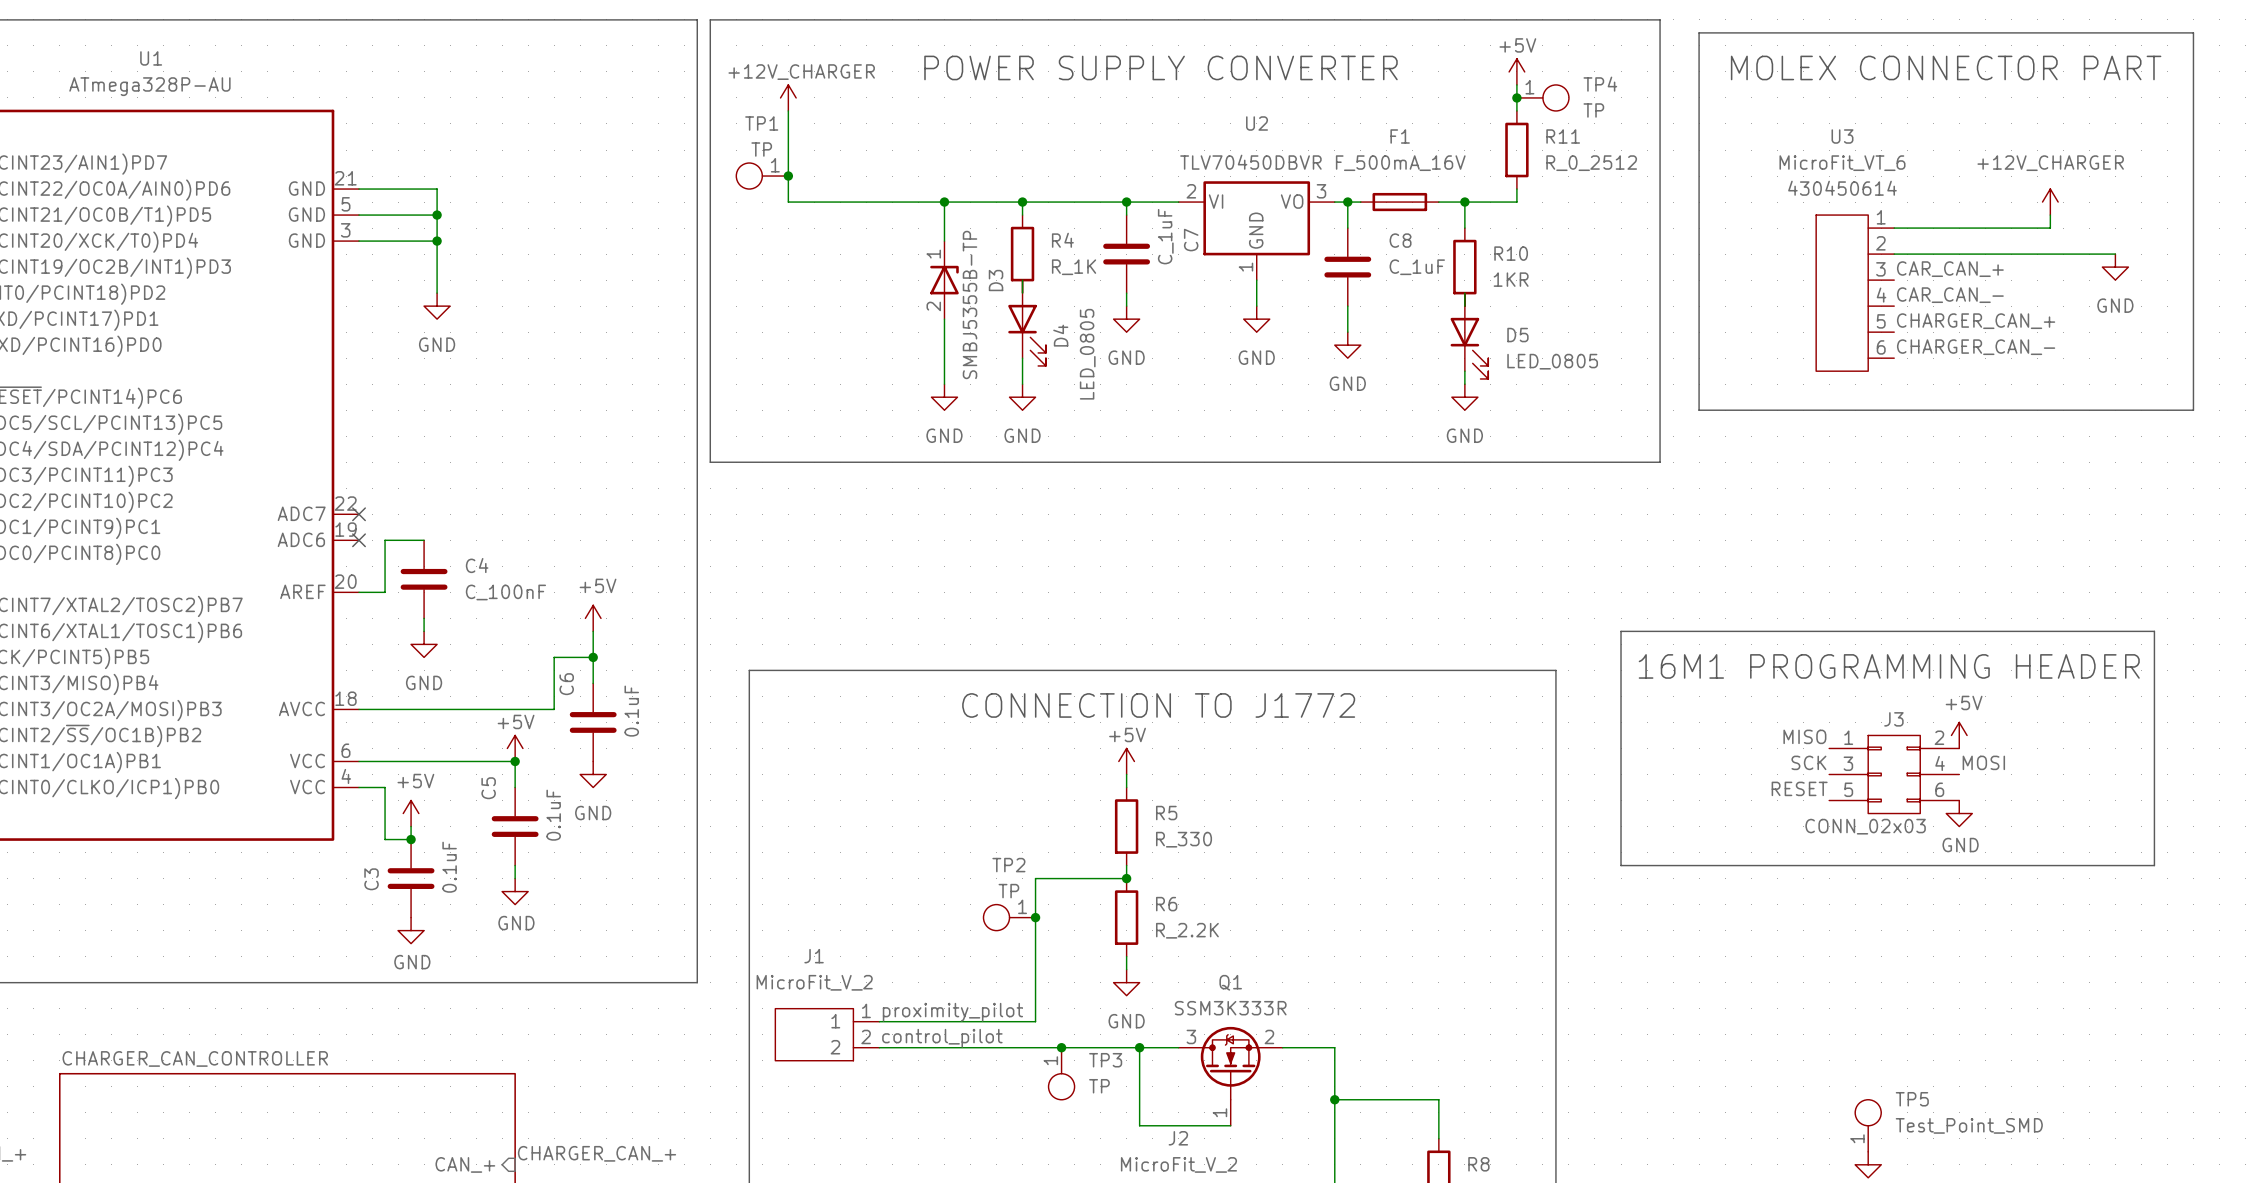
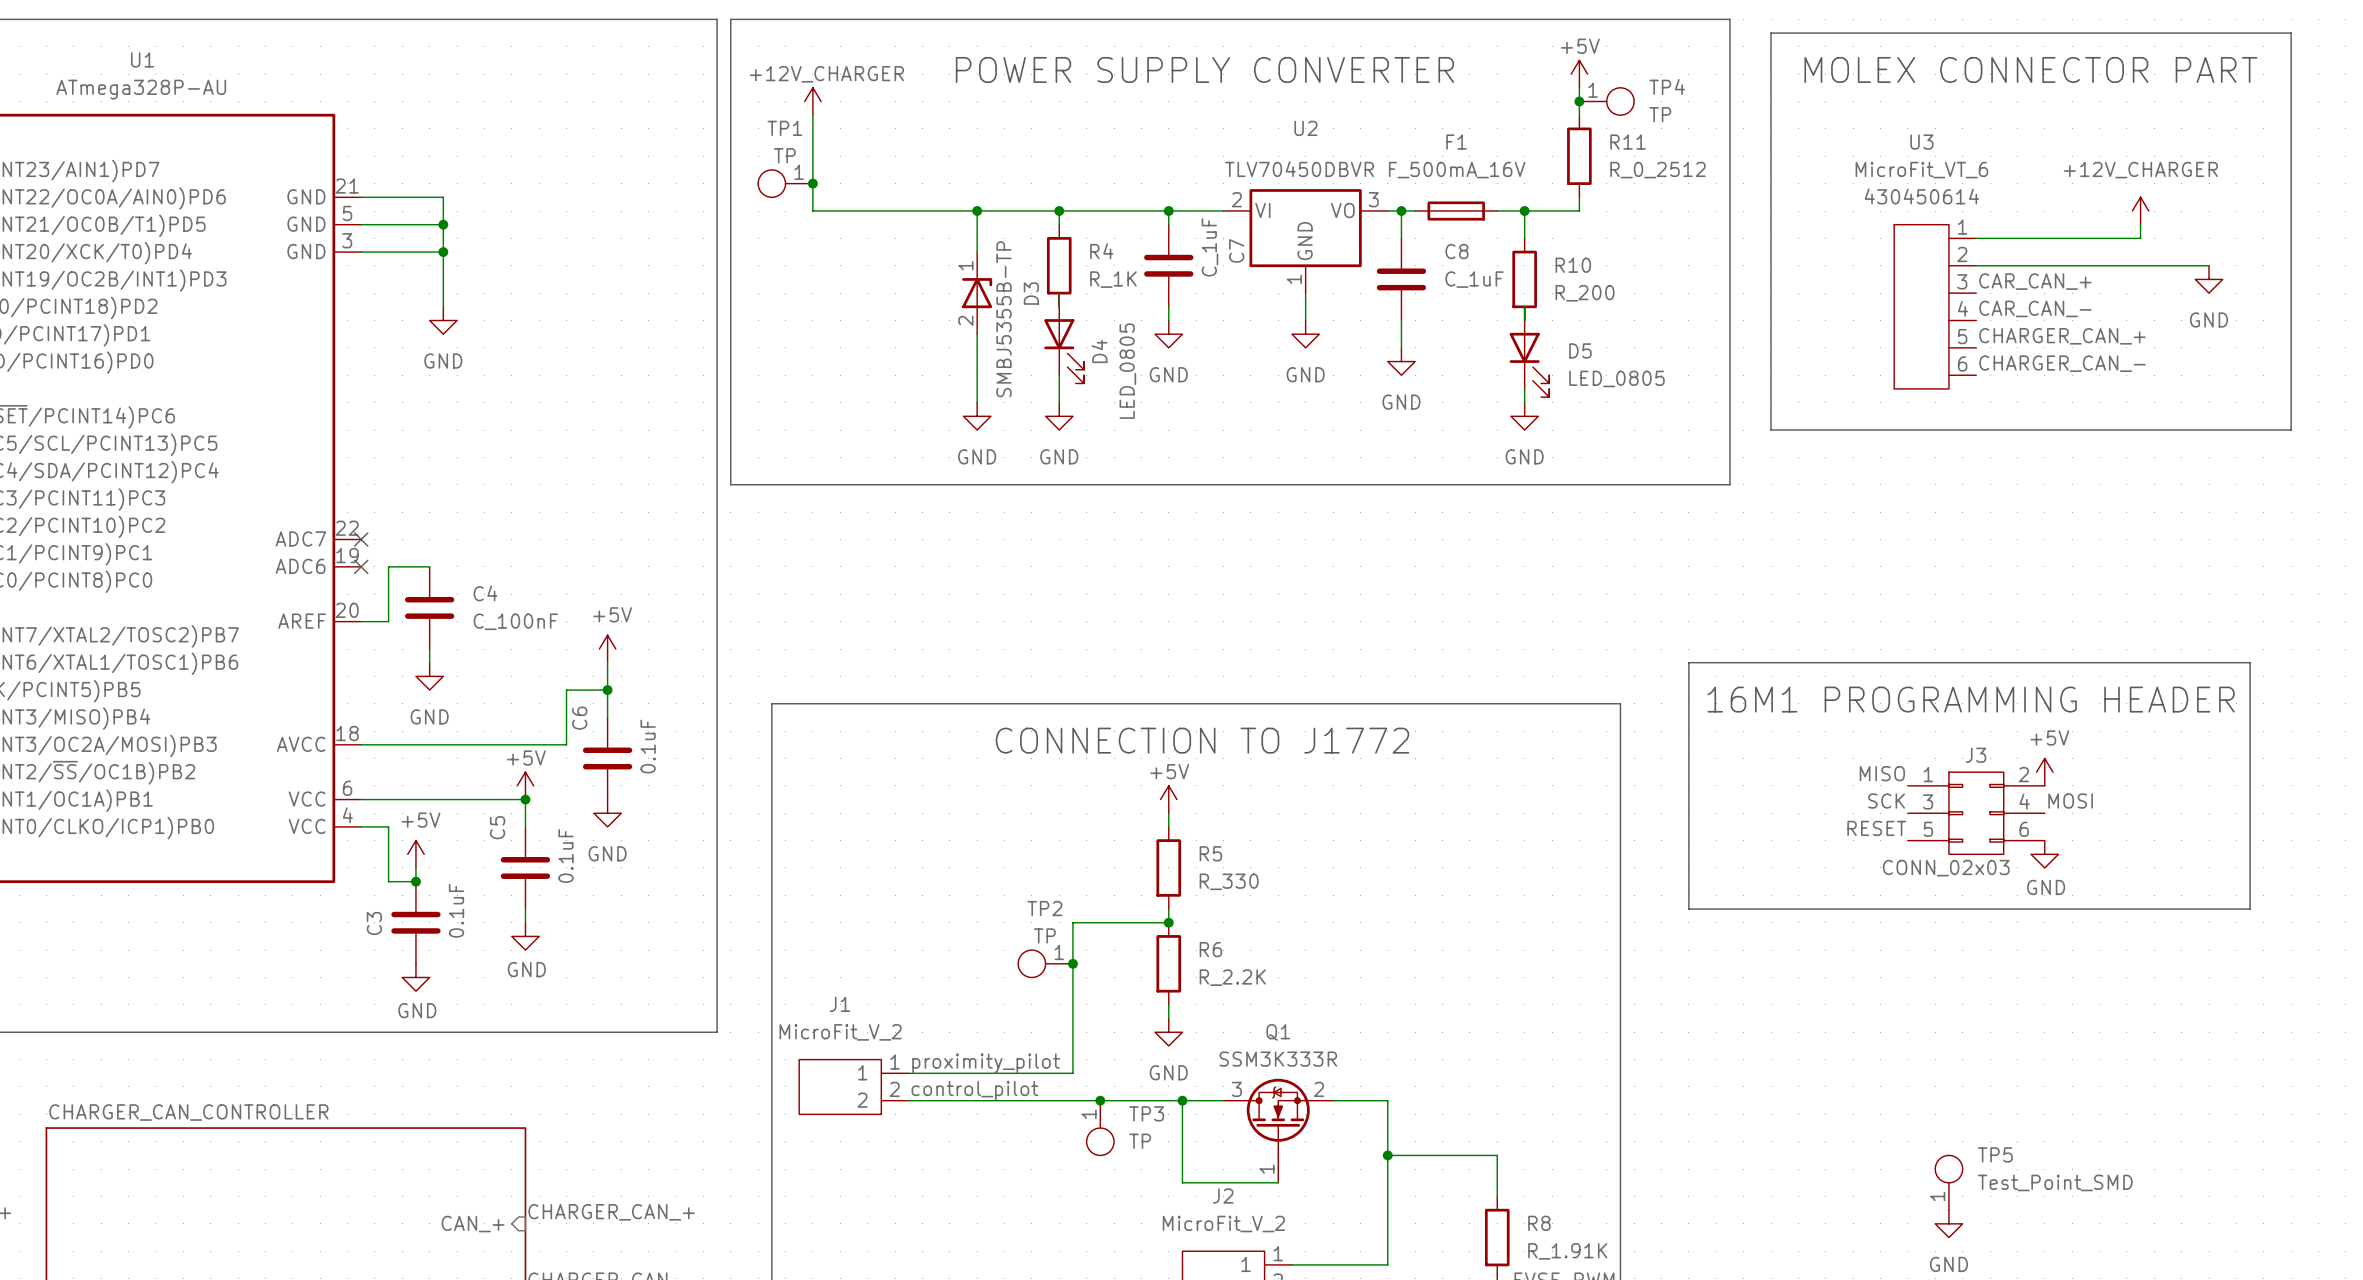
R10 value: 1KR (1511, 279) -> R_200 (1585, 293)

